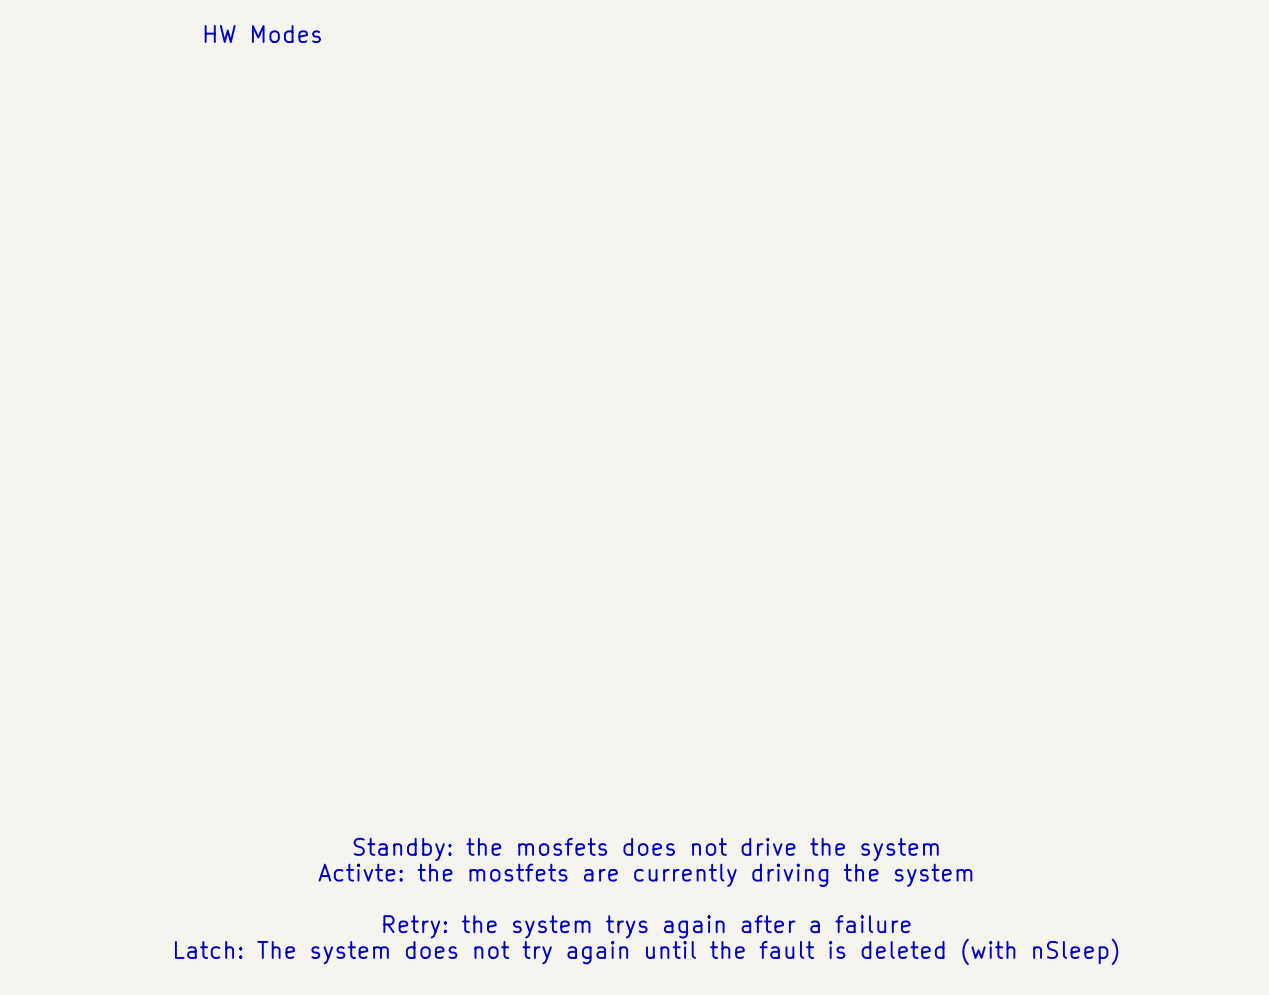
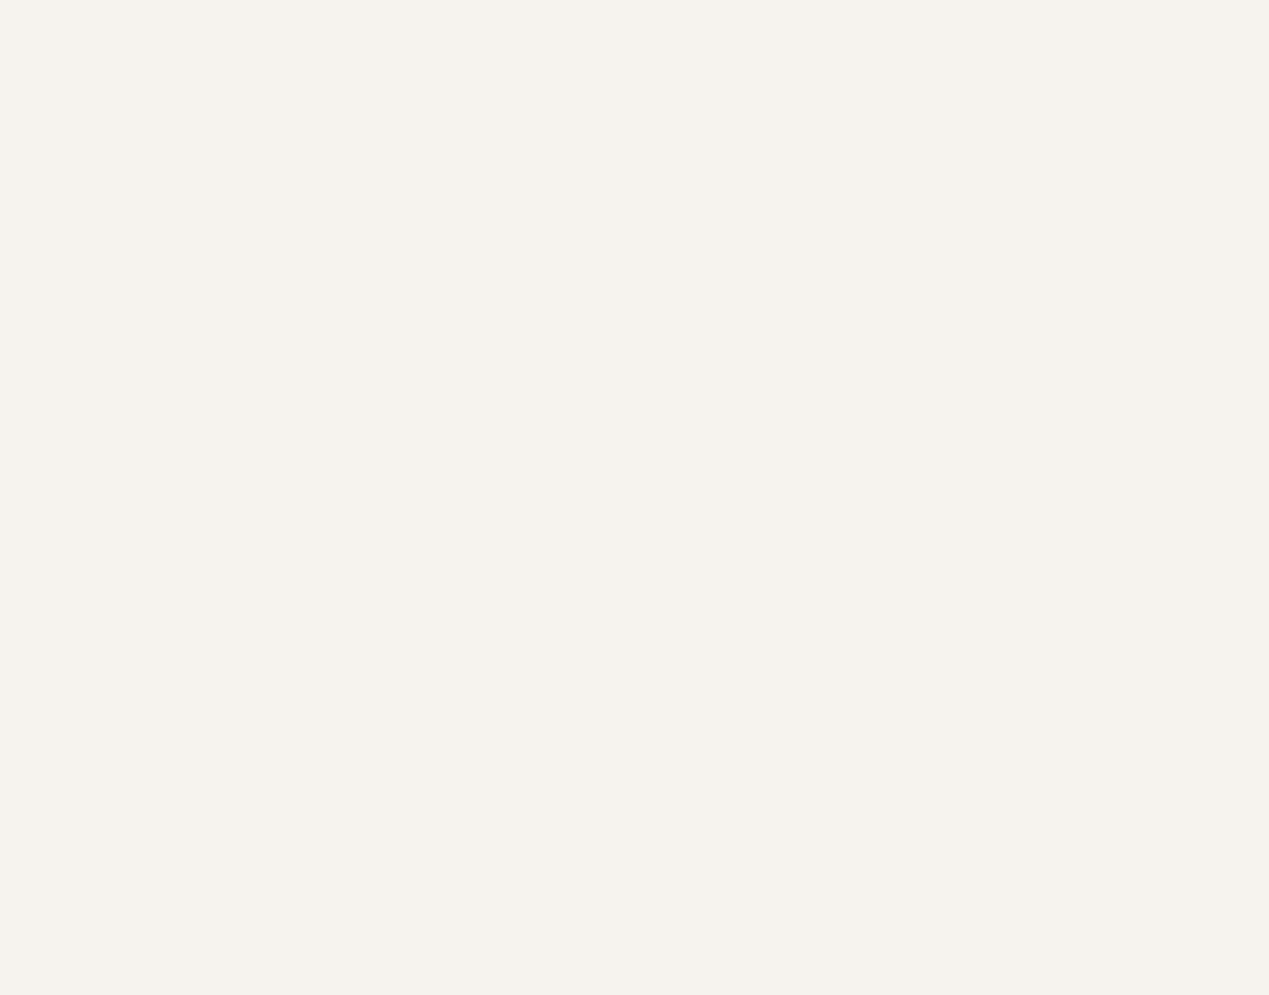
text: HW Modes (262, 34) -> none
text: Standby: the mosfets does not drive the system (646, 849) -> none
text: Activte: the mostfets are currently driving the system (645, 875) -> none
text: Retry: the system trys again after a failure (646, 926) -> none
text: Latch: The system does not try again until the fault is deleted (with nSleep) (646, 951) -> none

